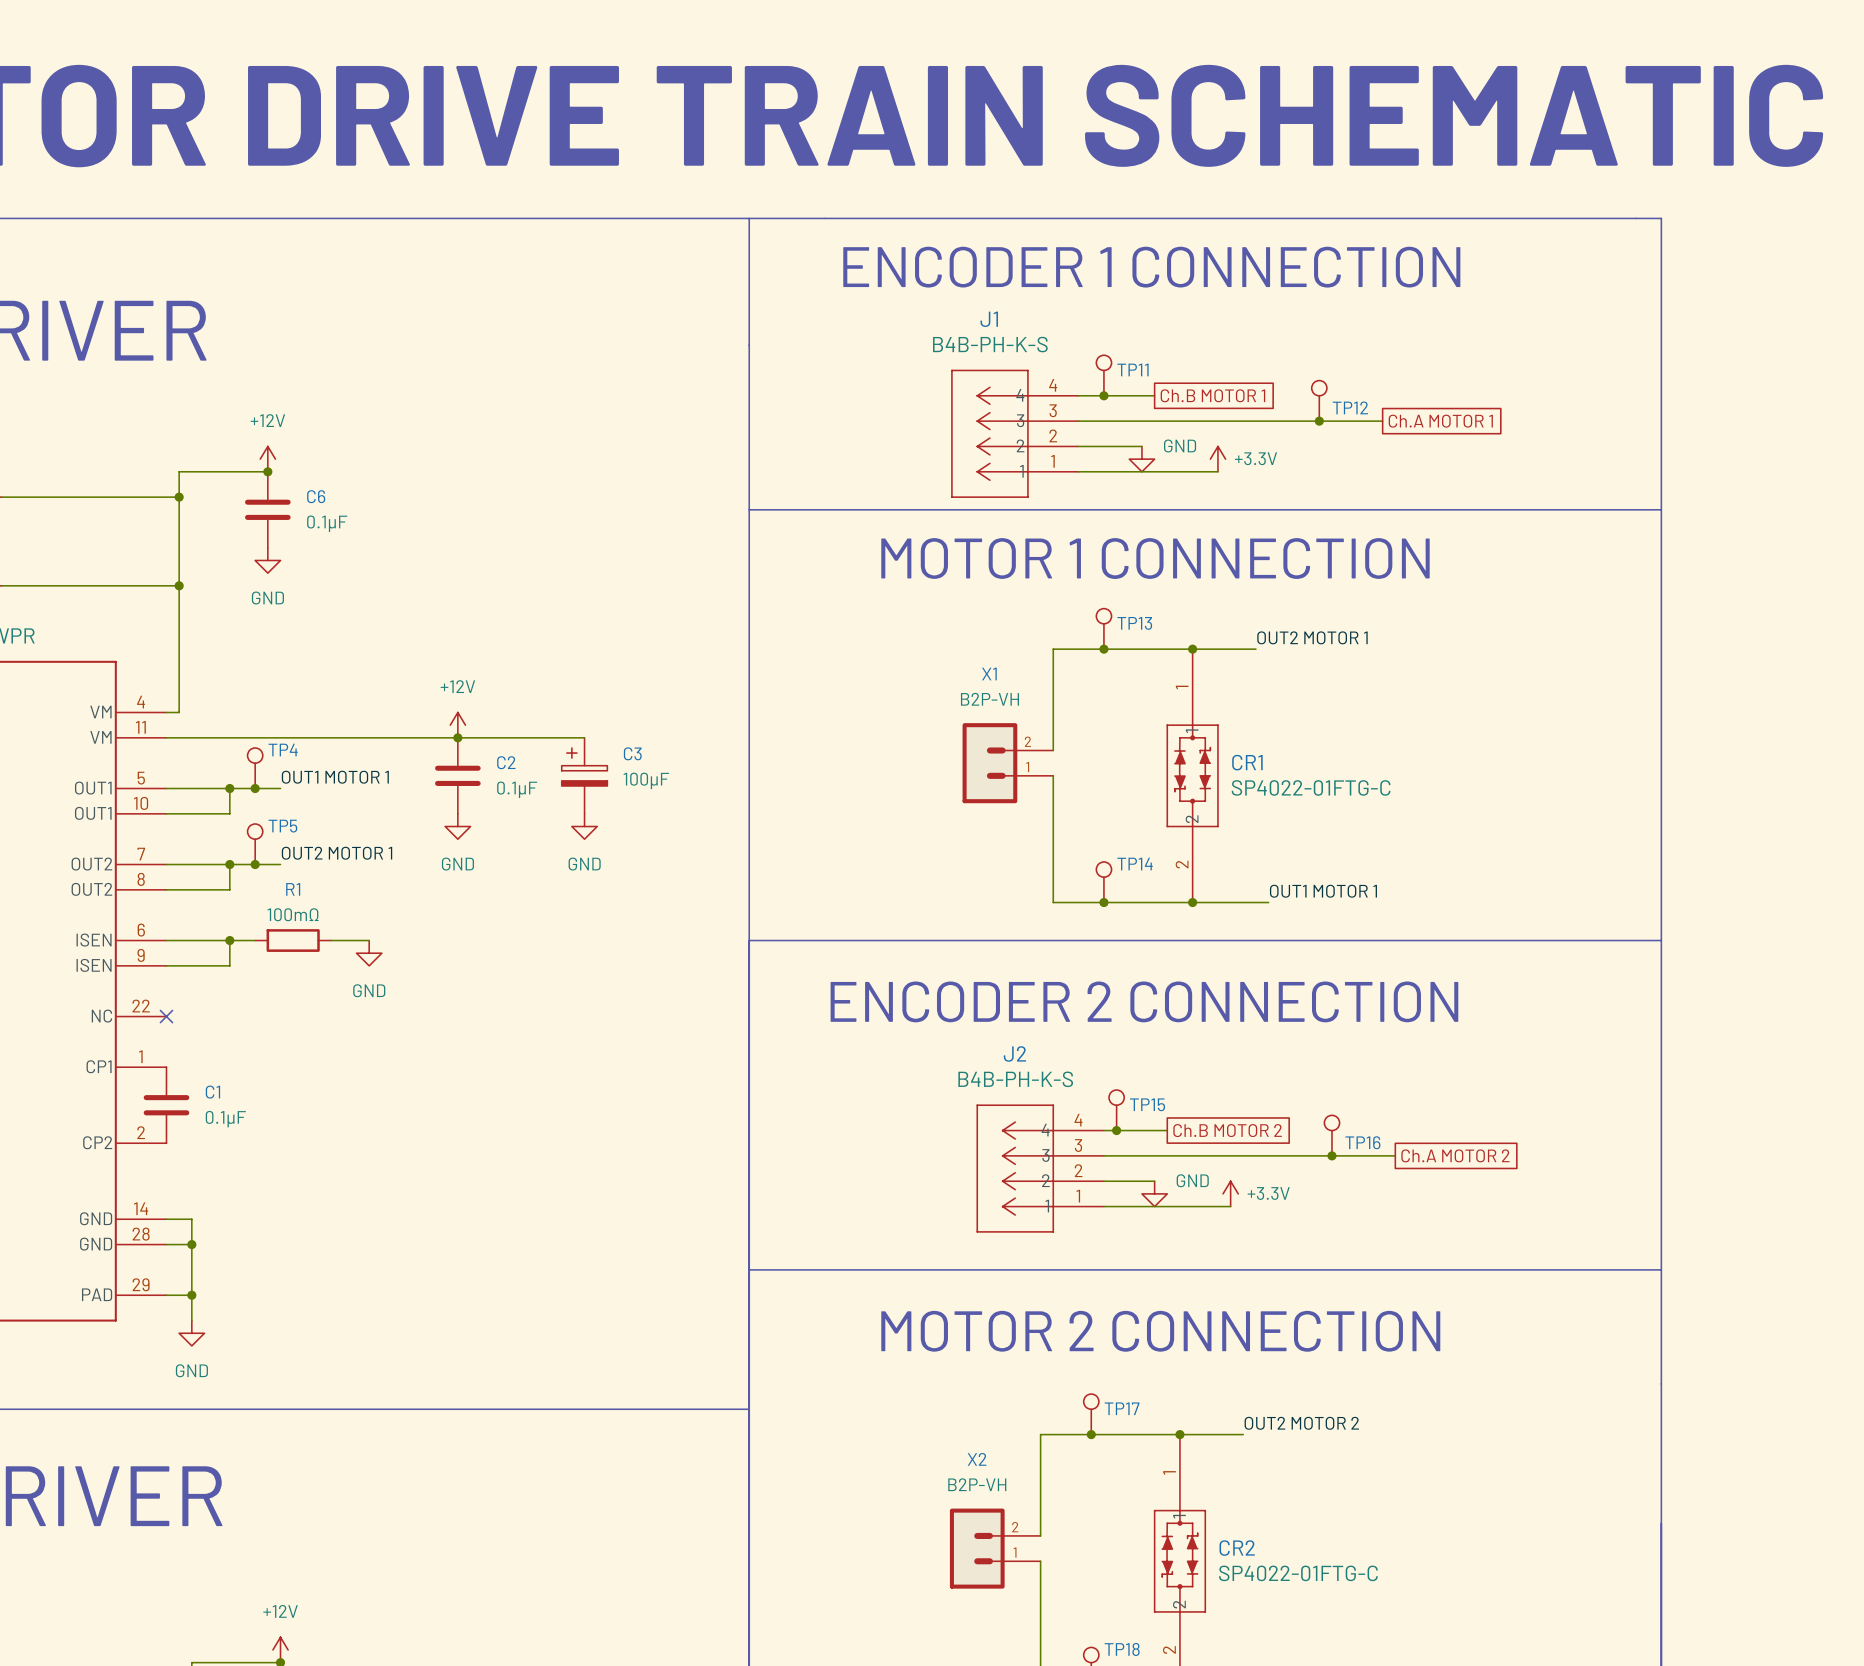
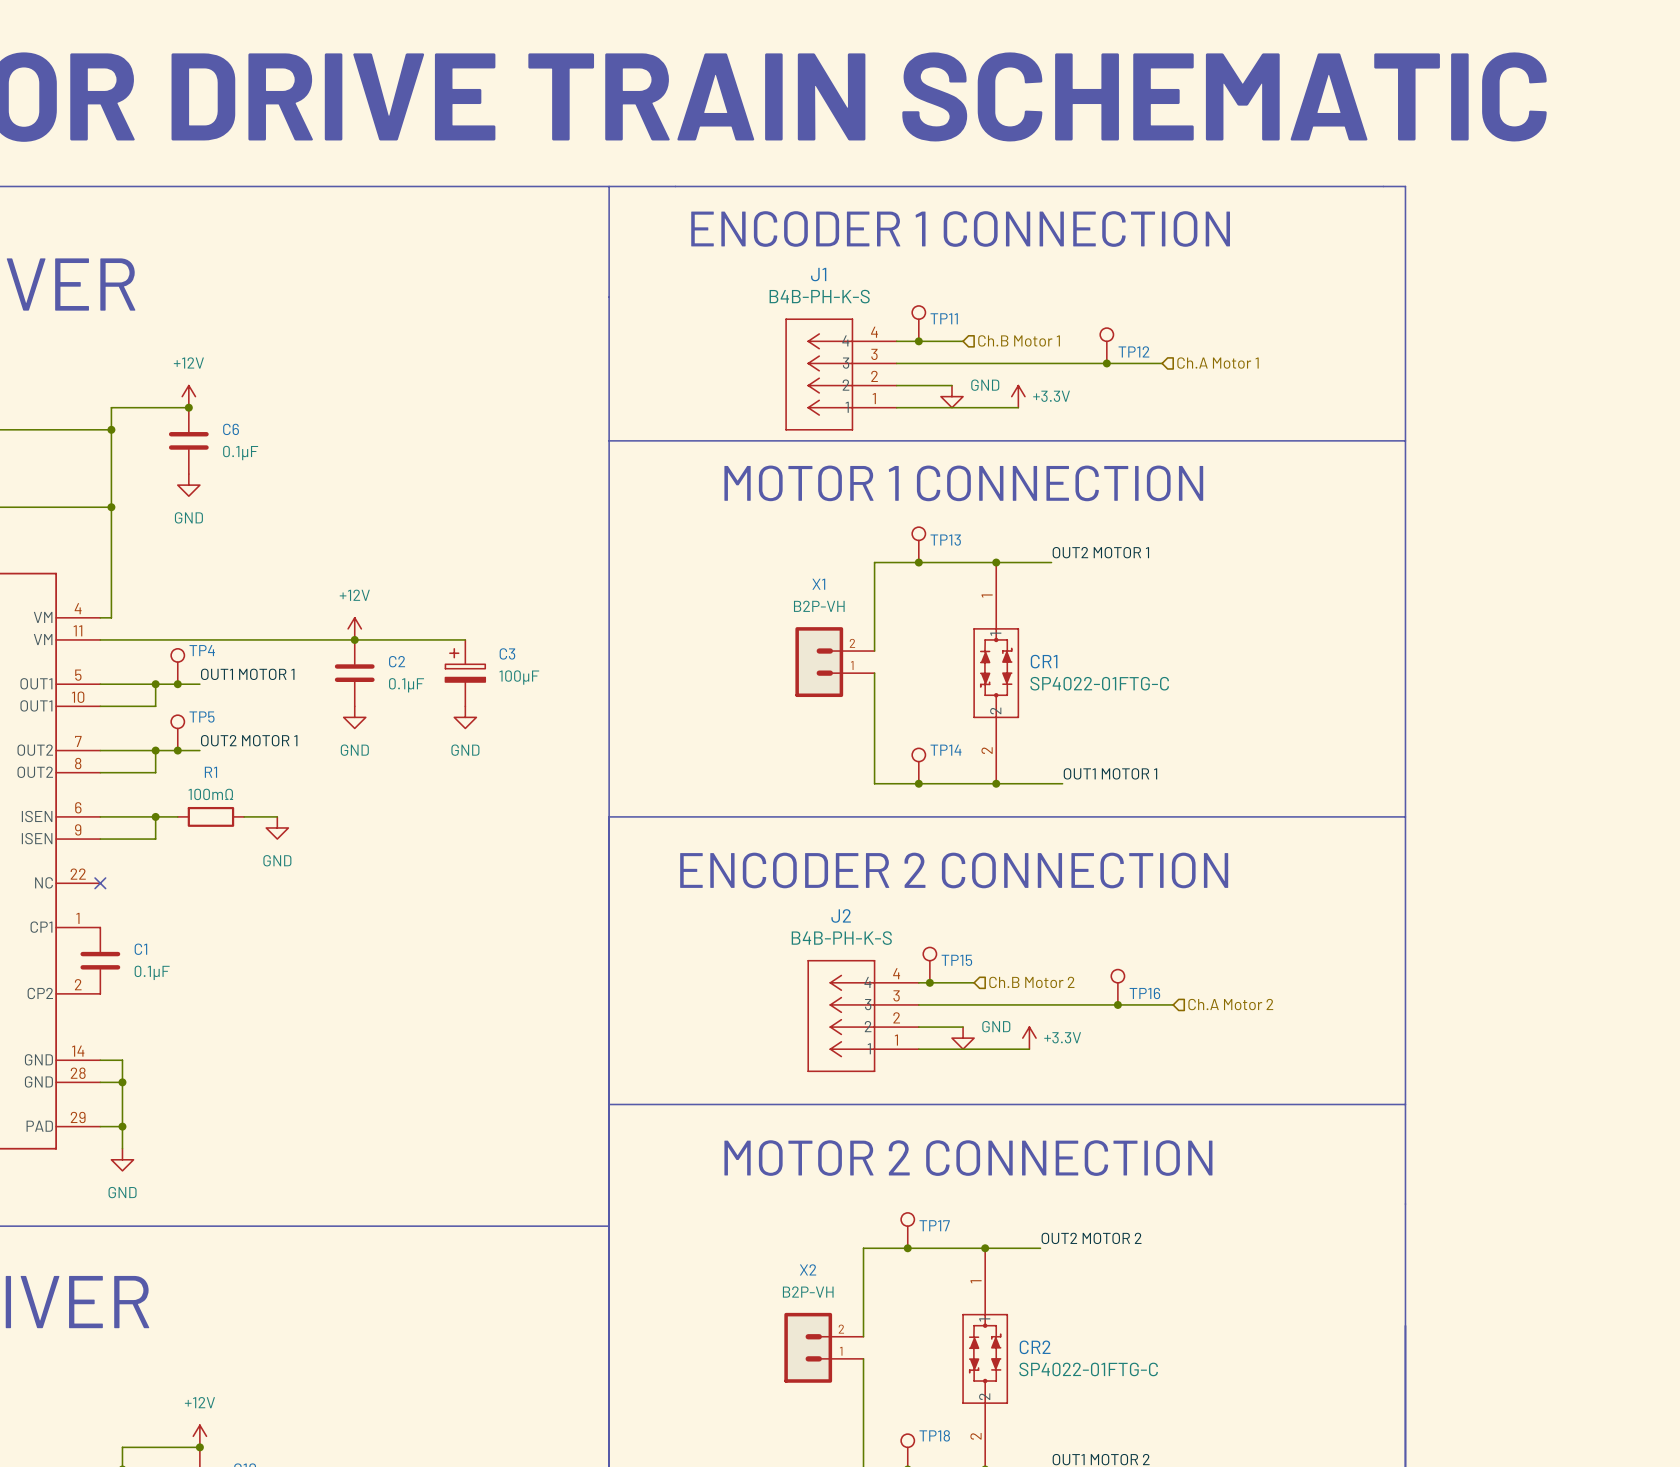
global label: Ch.B MOTOR 1 (1212, 395) -> none
hierarchical label: none -> Ch.B Motor 1 (1019, 340)
hierarchical label: none -> Ch.A Motor 1 (1218, 363)
global label: Ch.A MOTOR 1 (1440, 421) -> none
global label: Ch.B MOTOR 2 (1227, 1130) -> none
hierarchical label: none -> Ch.B Motor 2 (1031, 982)
global label: Ch.A MOTOR 2 (1455, 1155) -> none
hierarchical label: none -> Ch.A Motor 2 (1230, 1004)

